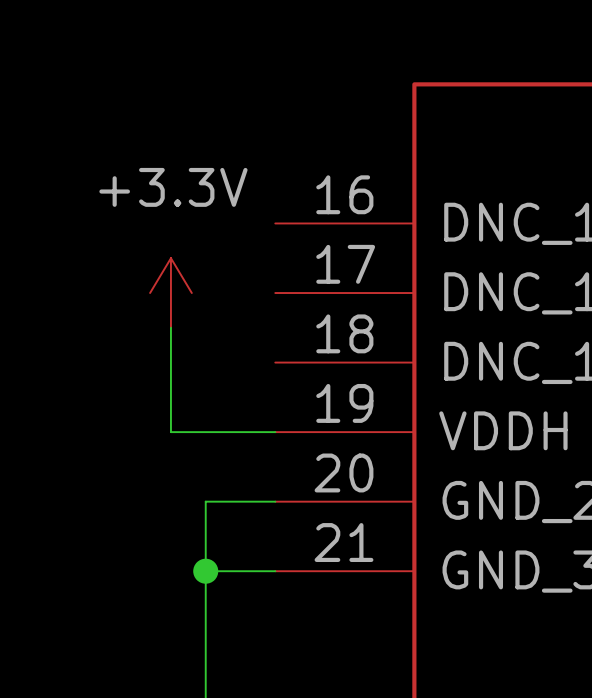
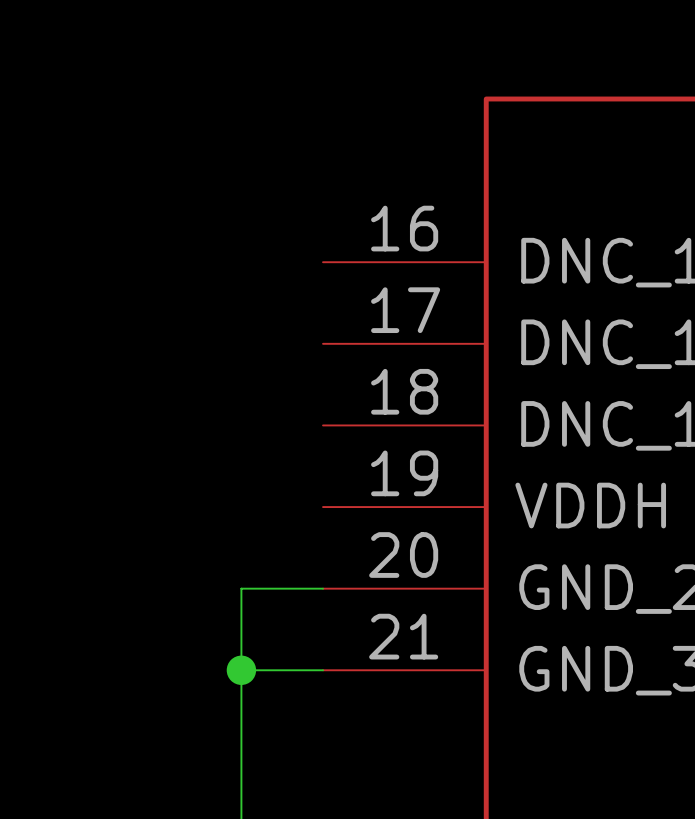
power symbol: +3.3V (170, 293) -> none
wire: (170, 327) (170, 432) (275, 432) -> none

